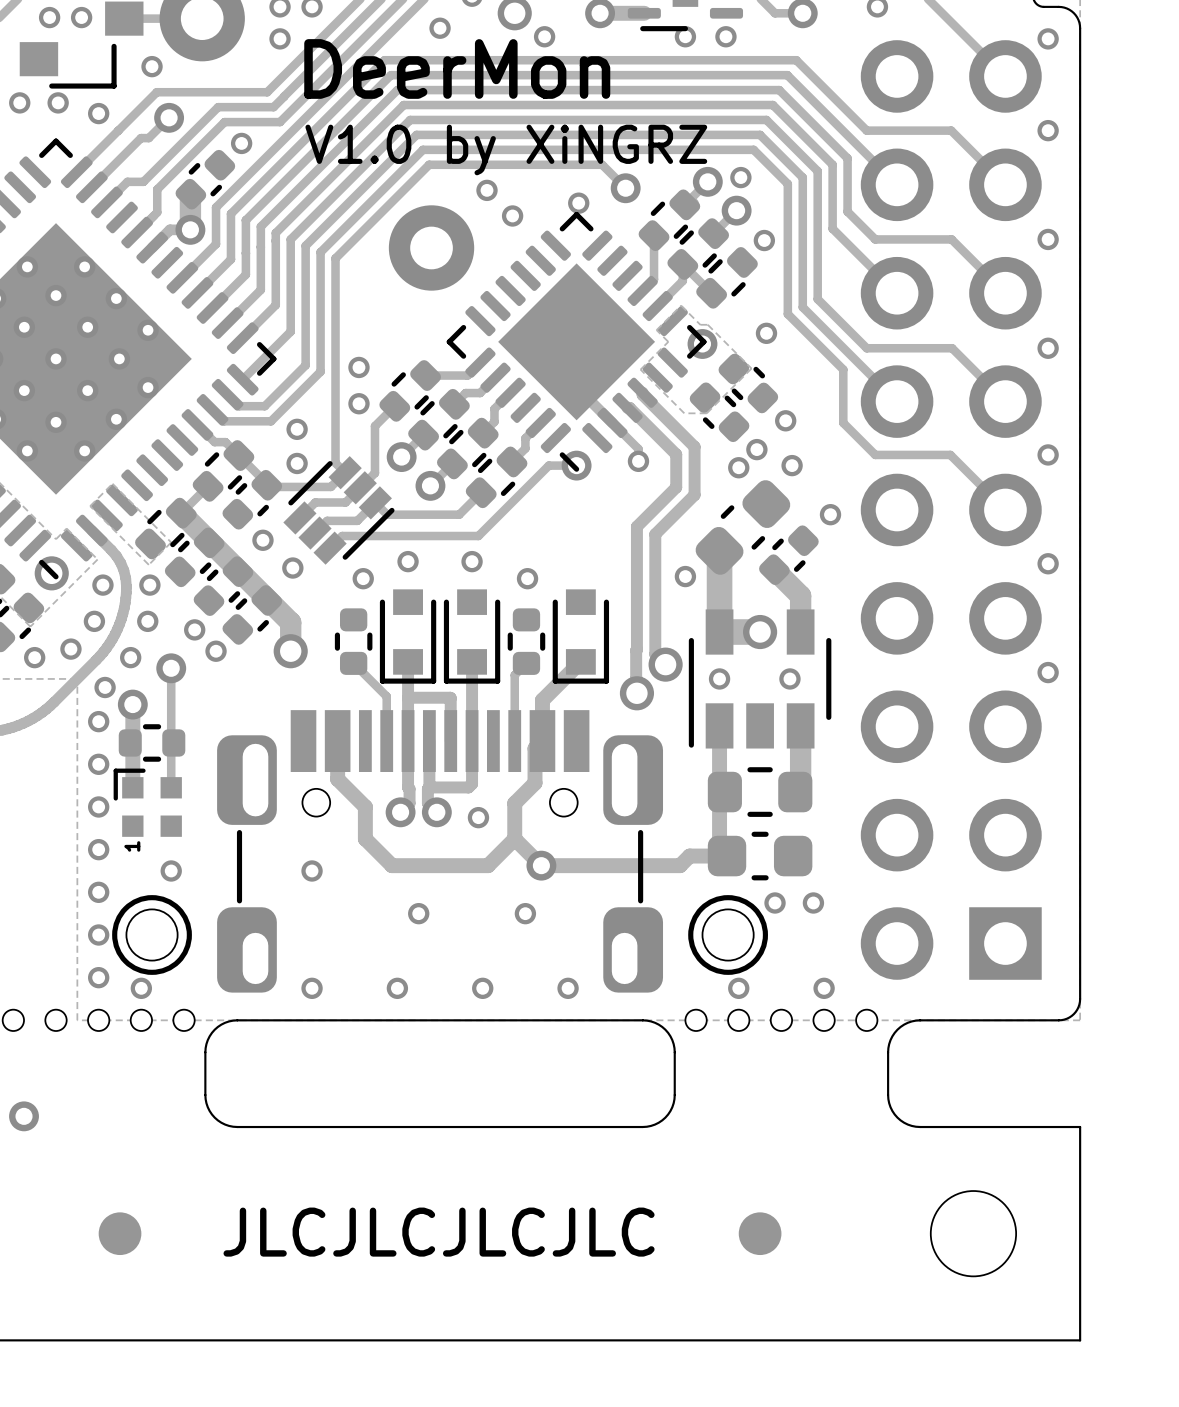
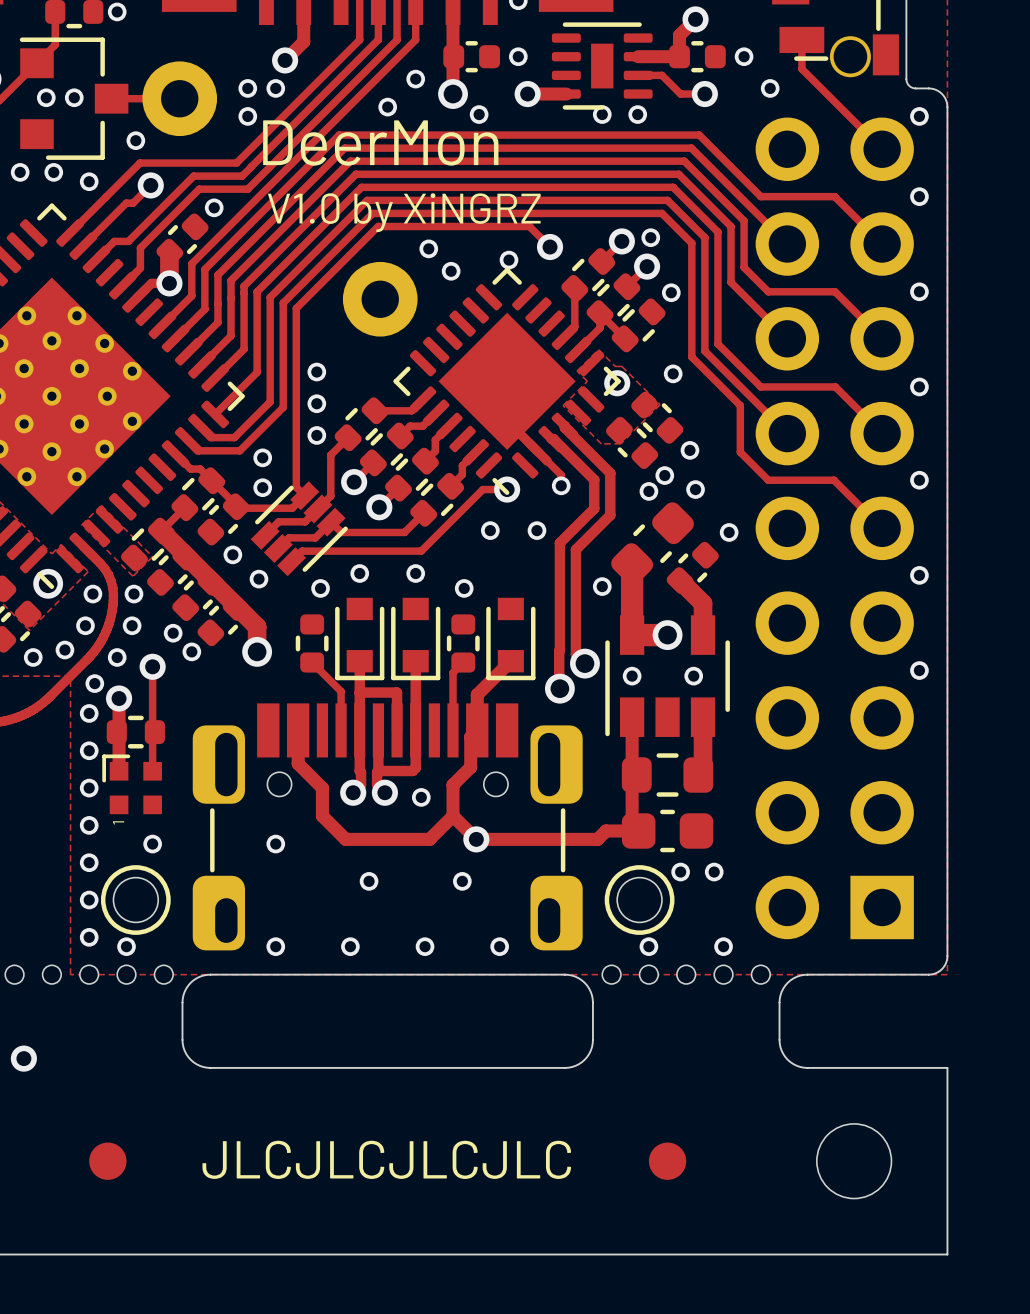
via: none -> (316, 372)
via: none -> (490, 530)
via: none -> (536, 530)

